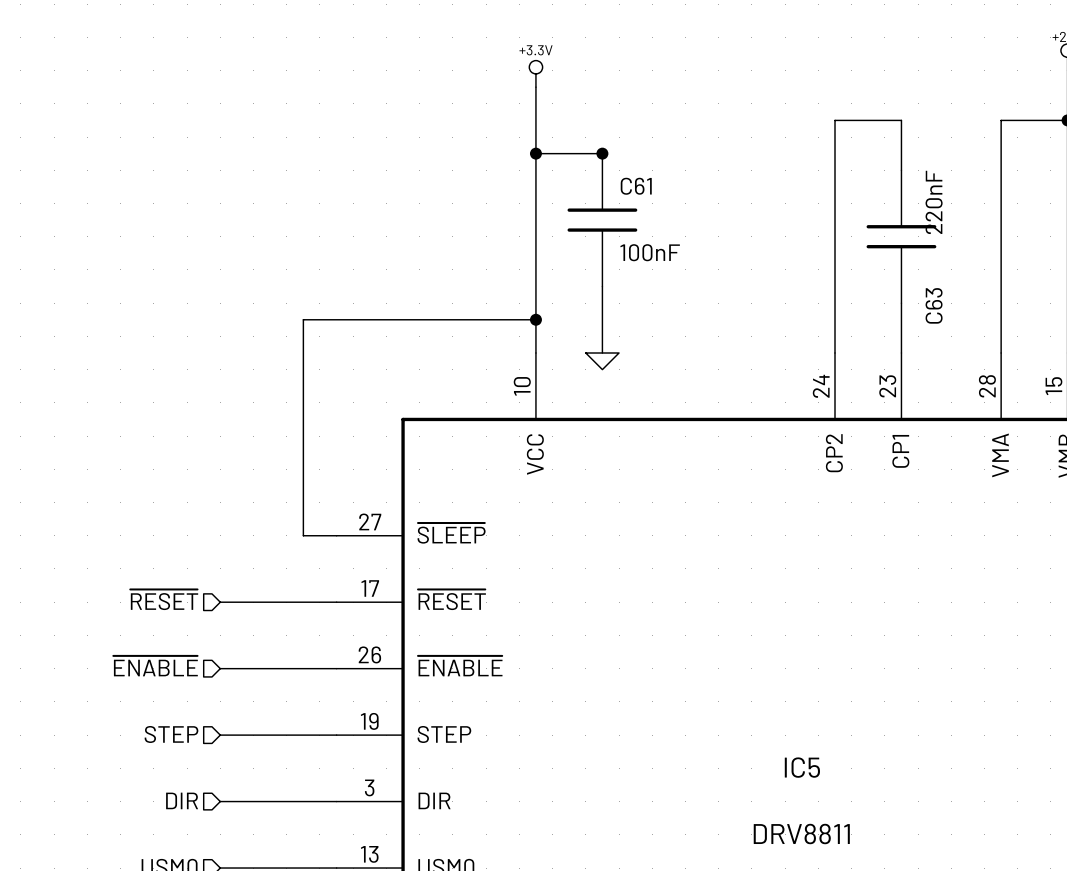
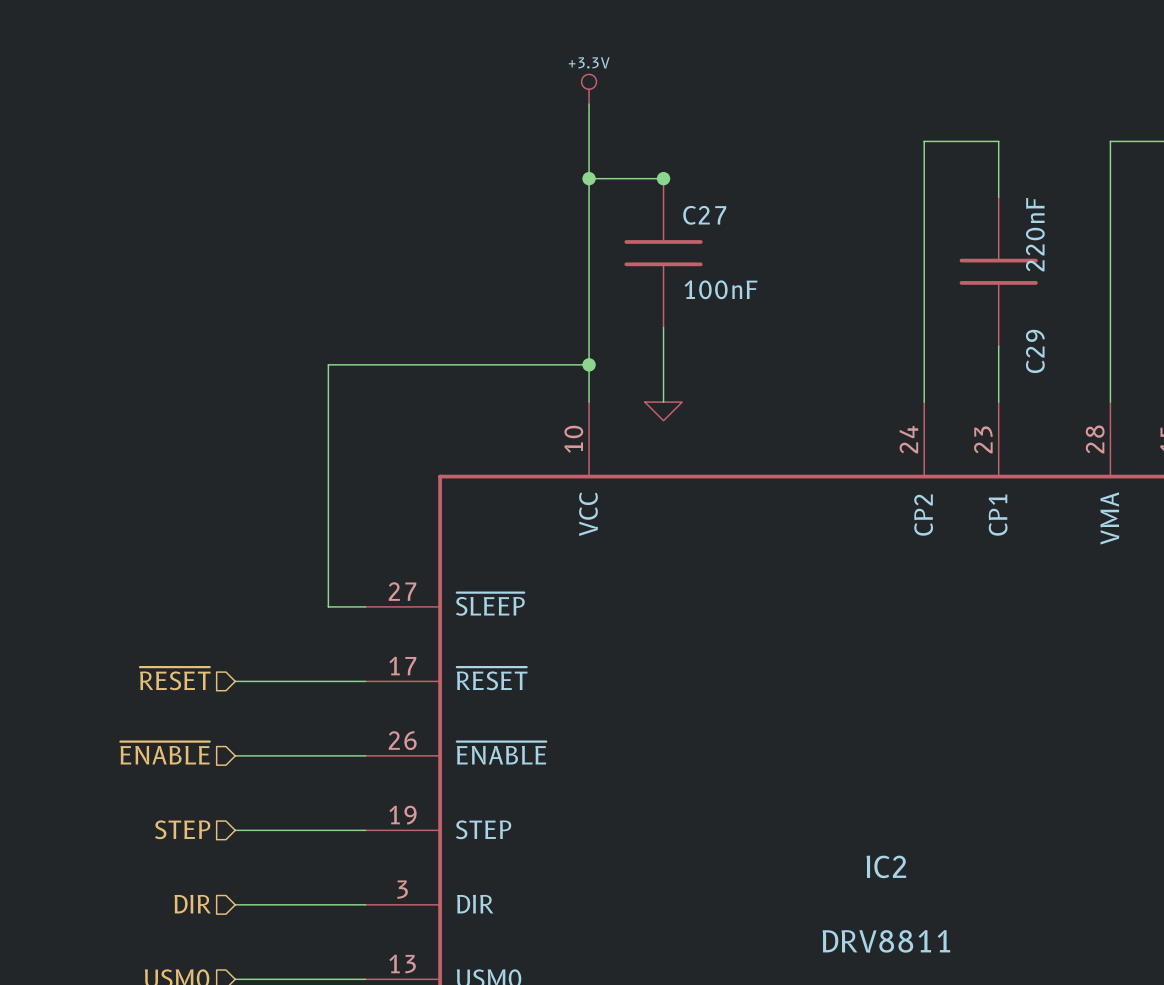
C61 name: C61 (636, 186) -> C27 (704, 215)
C63 name: C63 (934, 305) -> C29 (1035, 351)
IC5 name: IC5 (802, 767) -> IC2 (886, 866)

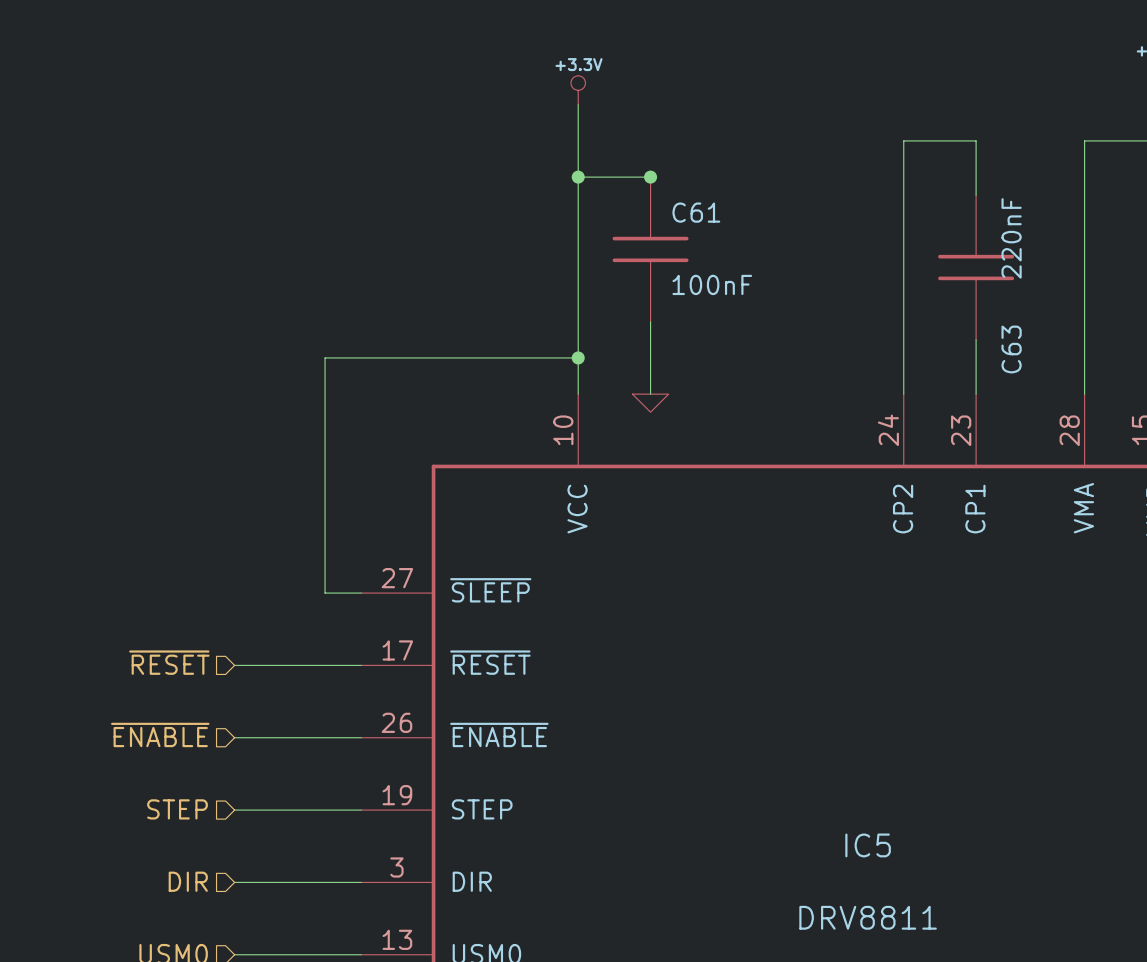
C27 name: C27 (704, 215) -> C61 (696, 212)
C29 name: C29 (1035, 351) -> C63 (1011, 349)
IC2 name: IC2 (886, 866) -> IC5 (868, 845)

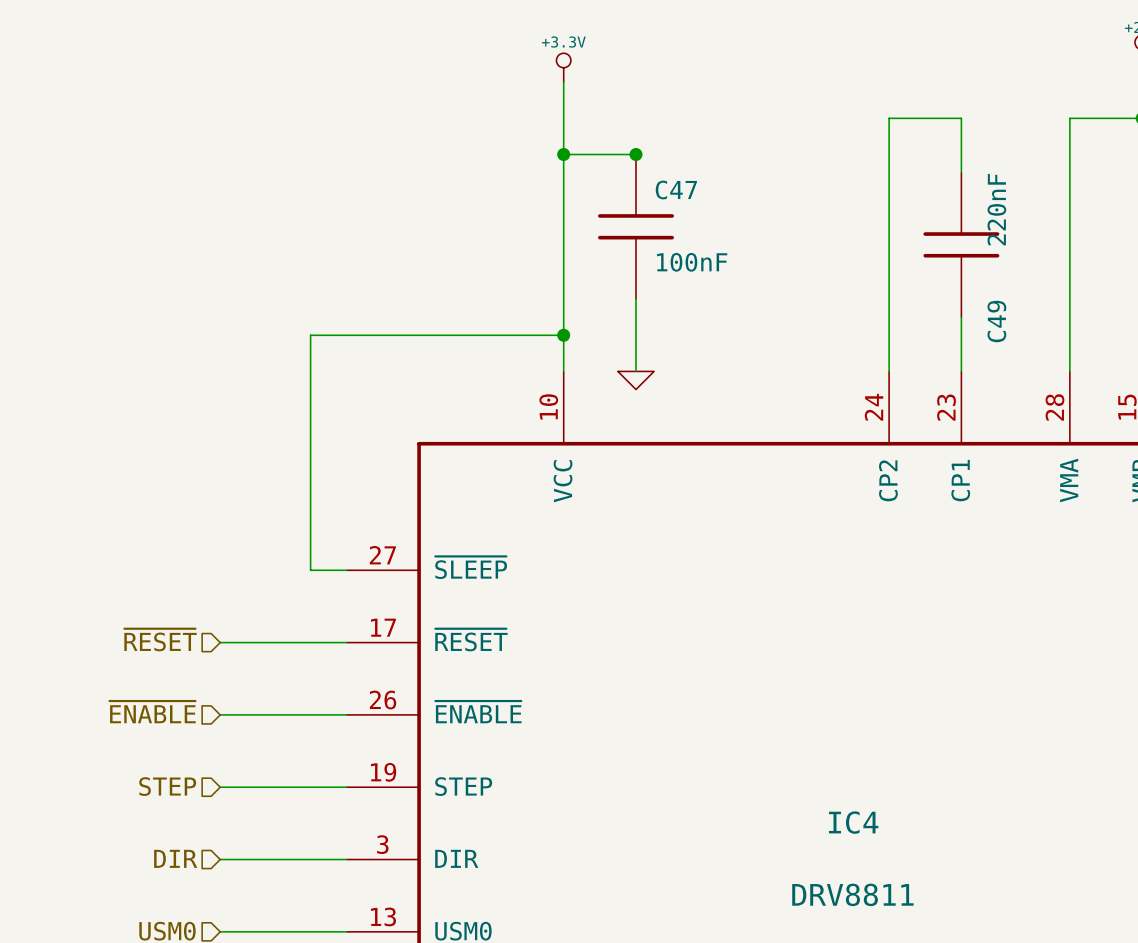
C61 name: C61 (696, 212) -> C47 (676, 189)
C63 name: C63 (1011, 349) -> C49 (996, 321)
IC5 name: IC5 (868, 845) -> IC4 (853, 822)

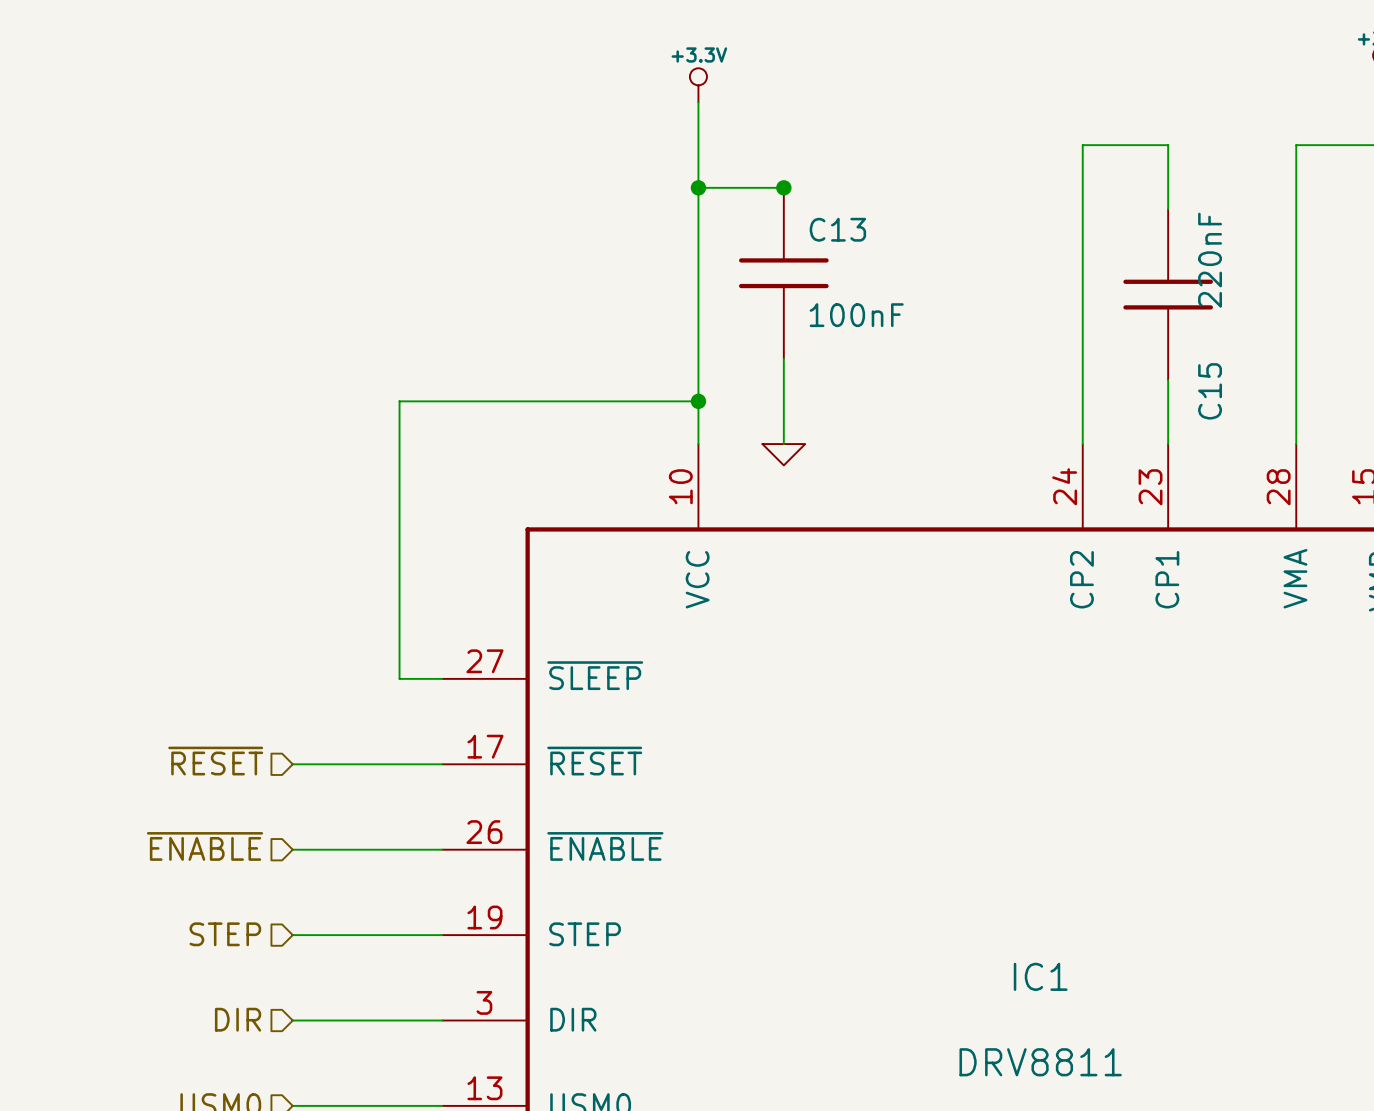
C47 name: C47 (676, 189) -> C13 (837, 229)
C49 name: C49 (996, 321) -> C15 (1210, 391)
IC4 name: IC4 (853, 822) -> IC1 (1040, 976)

